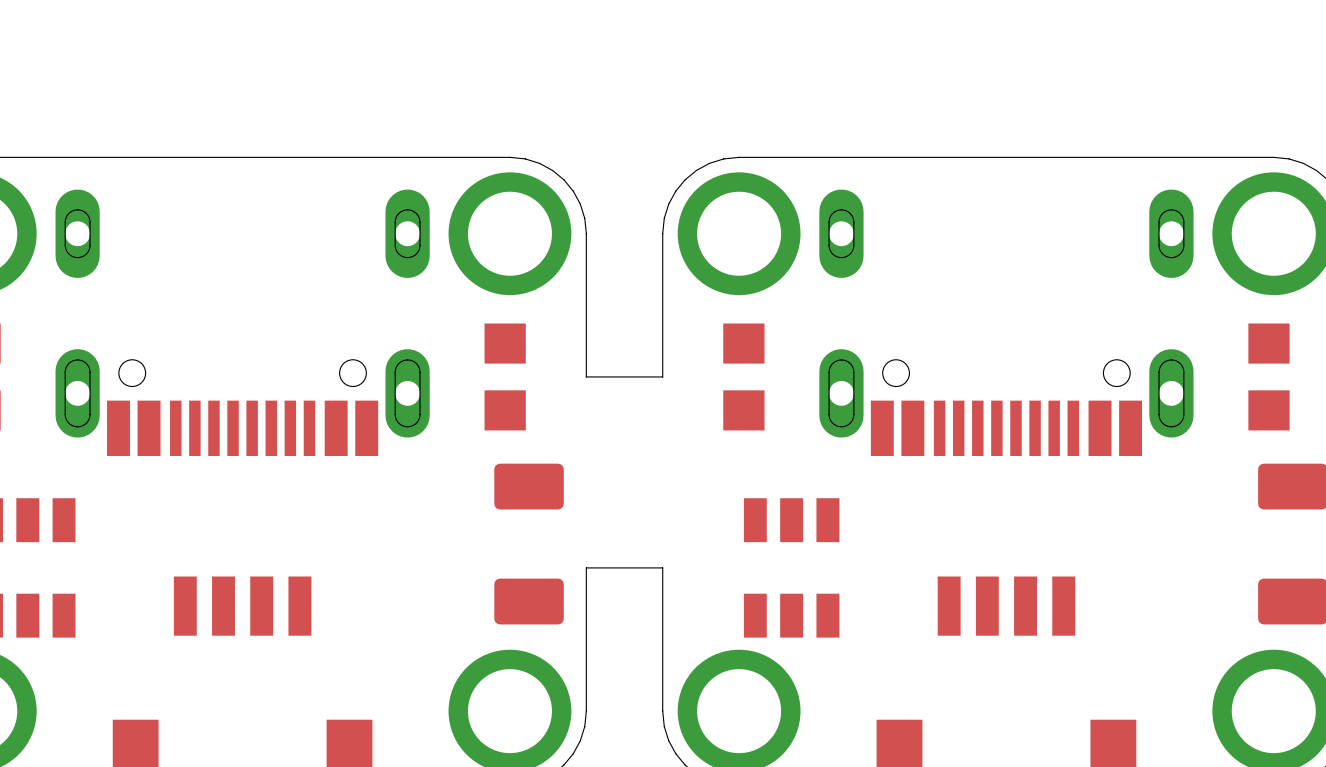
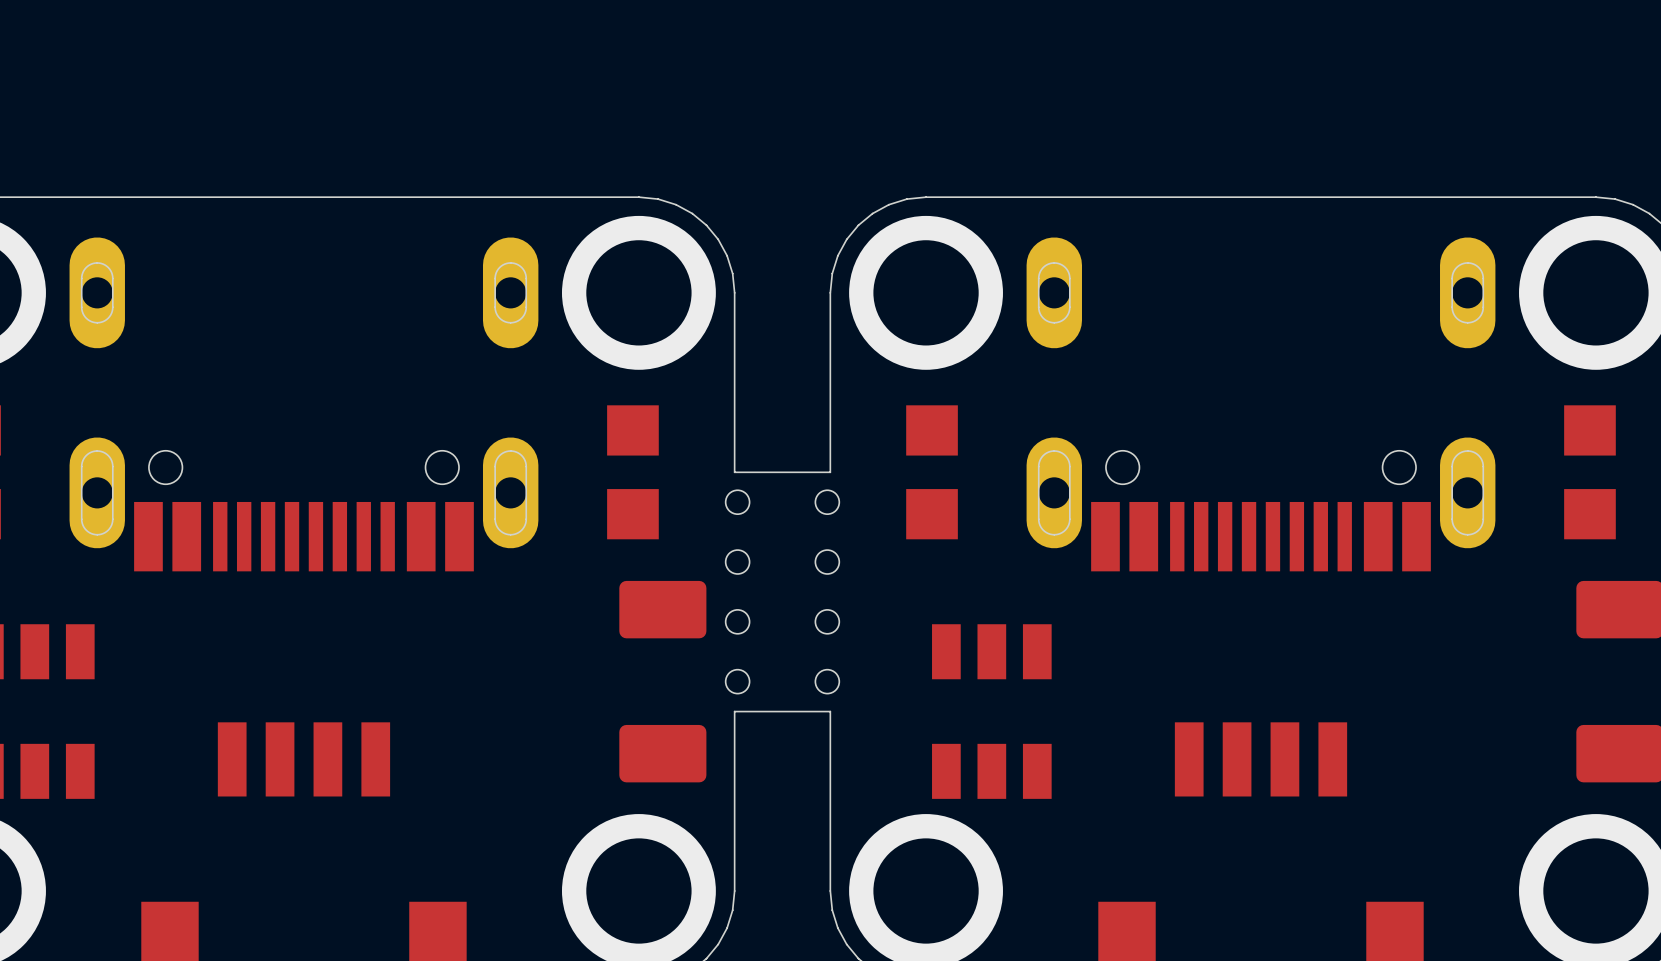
round board edge: none -> [725, 490, 750, 515]
round board edge: none -> [815, 490, 840, 515]
round board edge: none -> [725, 549, 750, 575]
round board edge: none -> [815, 549, 840, 575]
round board edge: none -> [725, 609, 750, 635]
round board edge: none -> [815, 609, 840, 635]
round board edge: none -> [725, 669, 750, 694]
round board edge: none -> [815, 669, 840, 694]

